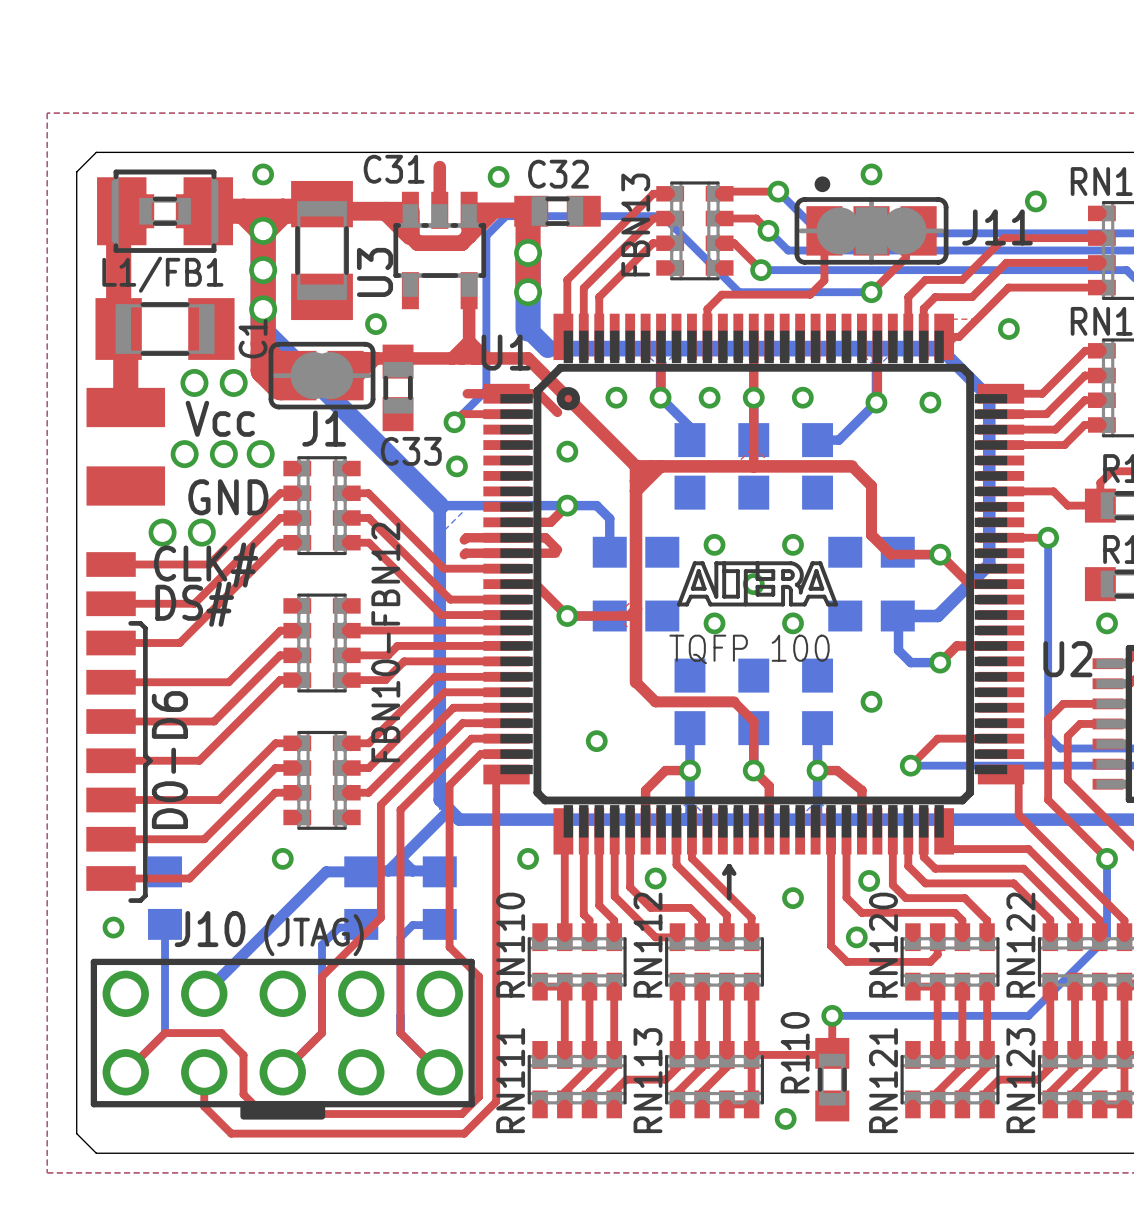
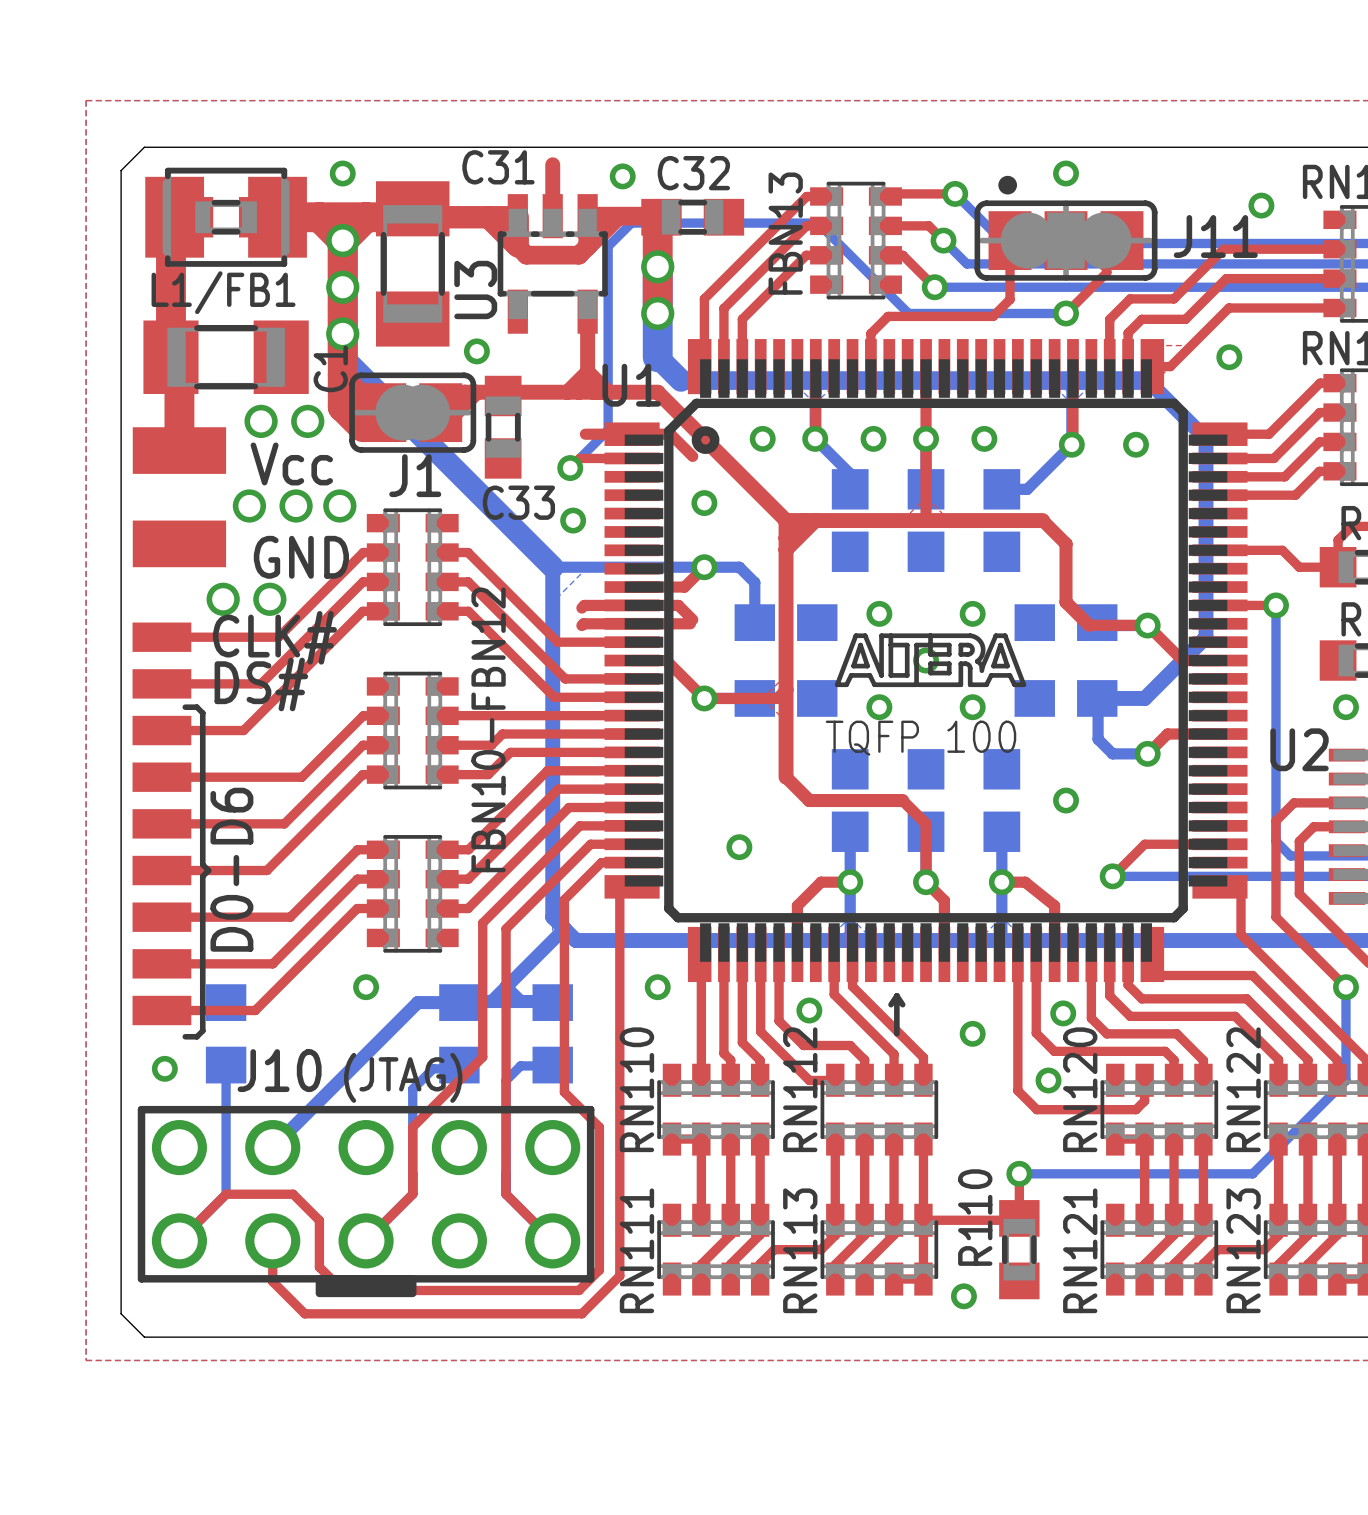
part footprint: [291, 180, 353, 321] -> [376, 181, 450, 347]
part footprint: [95, 298, 235, 360] -> [143, 320, 309, 394]

